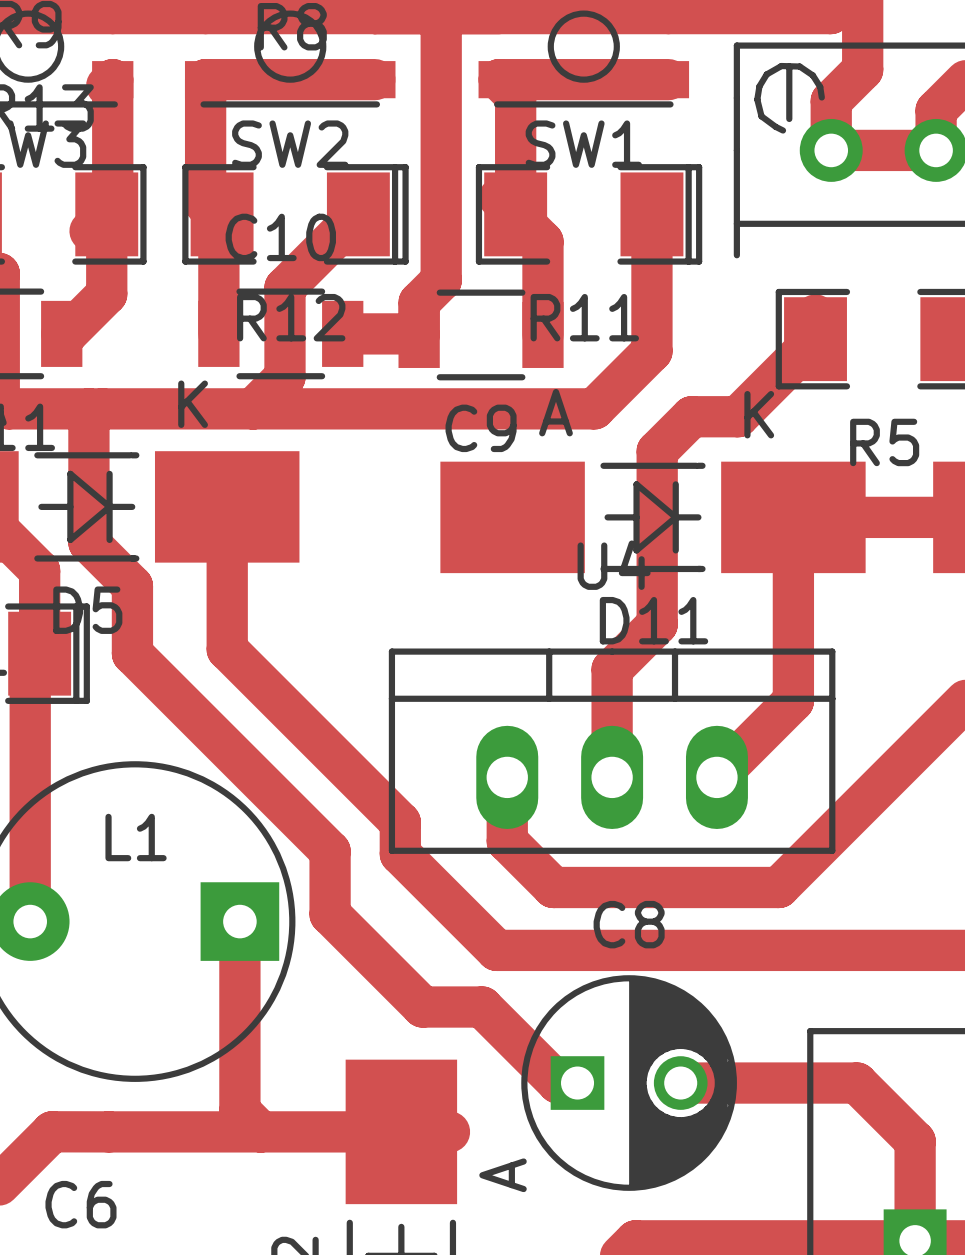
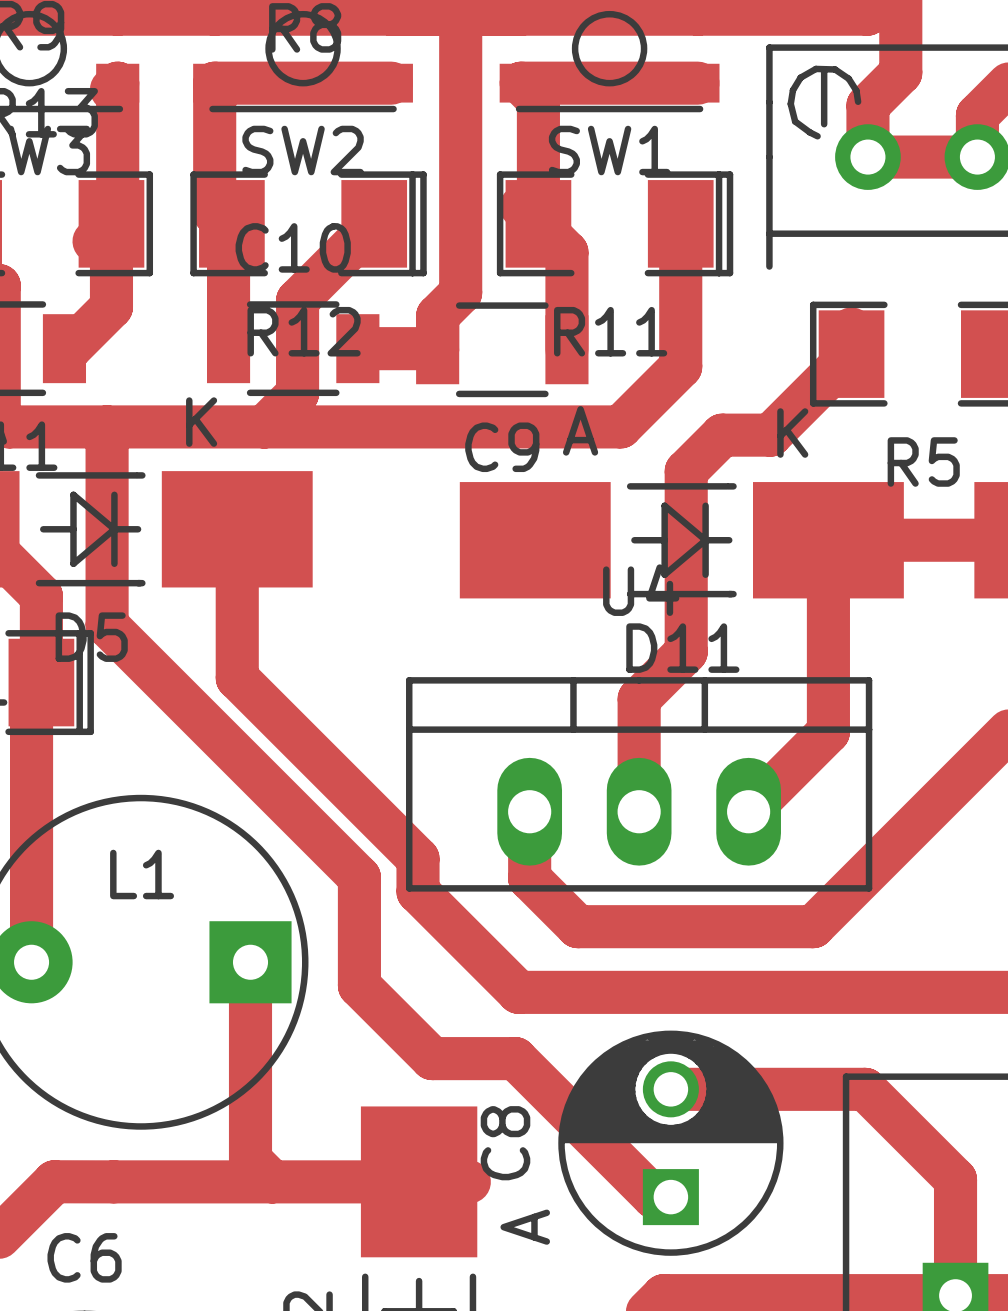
top track: (88, 408) (88, 542) (132, 586) (132, 653) (330, 851) (330, 914) (422, 1007) (482, 1007) (558, 1083) (577, 1083) -> none
top track: none -> (107, 426) (107, 625) (359, 877) (359, 985) (432, 1058) (515, 1058) (653, 1197) (670, 1197)
C8 rotation: 0° (629, 1083) -> 90° counterclockwise (670, 1143)
top track: (680, 1083) (856, 1083) (915, 1141) -> (670, 1089) (865, 1089) (955, 1179) (955, 1191)

